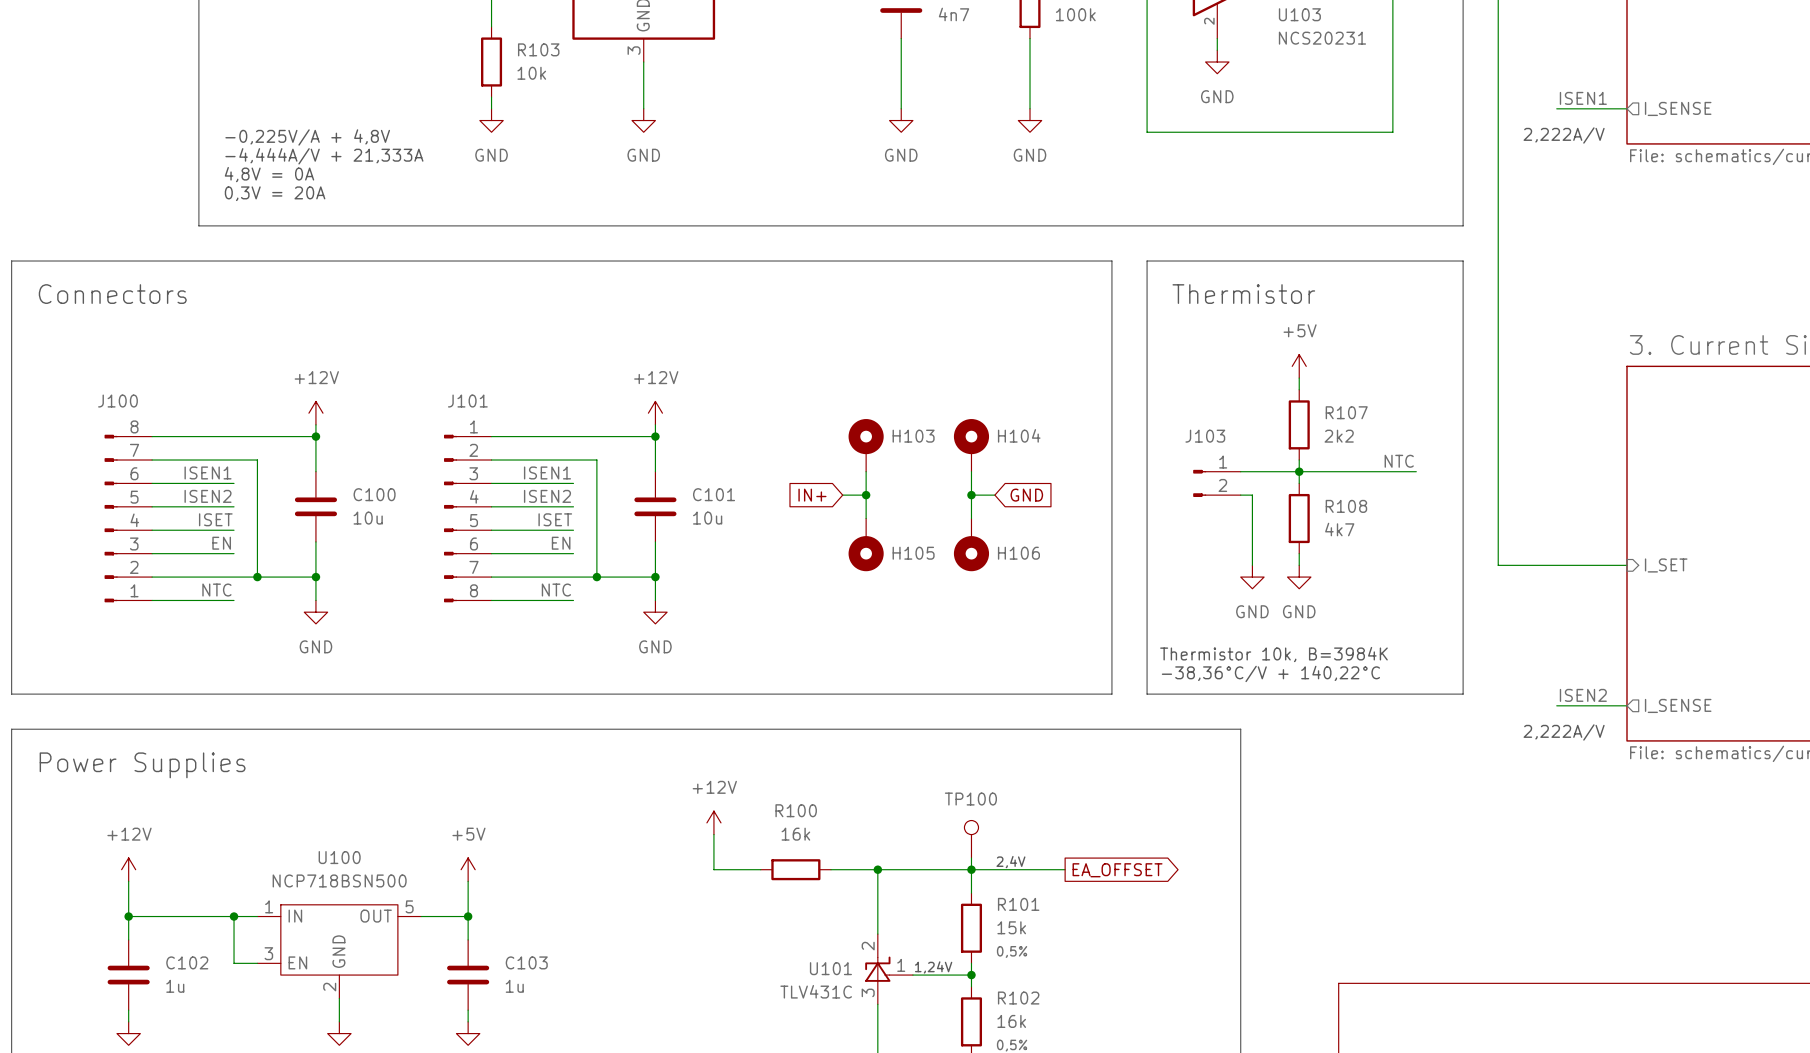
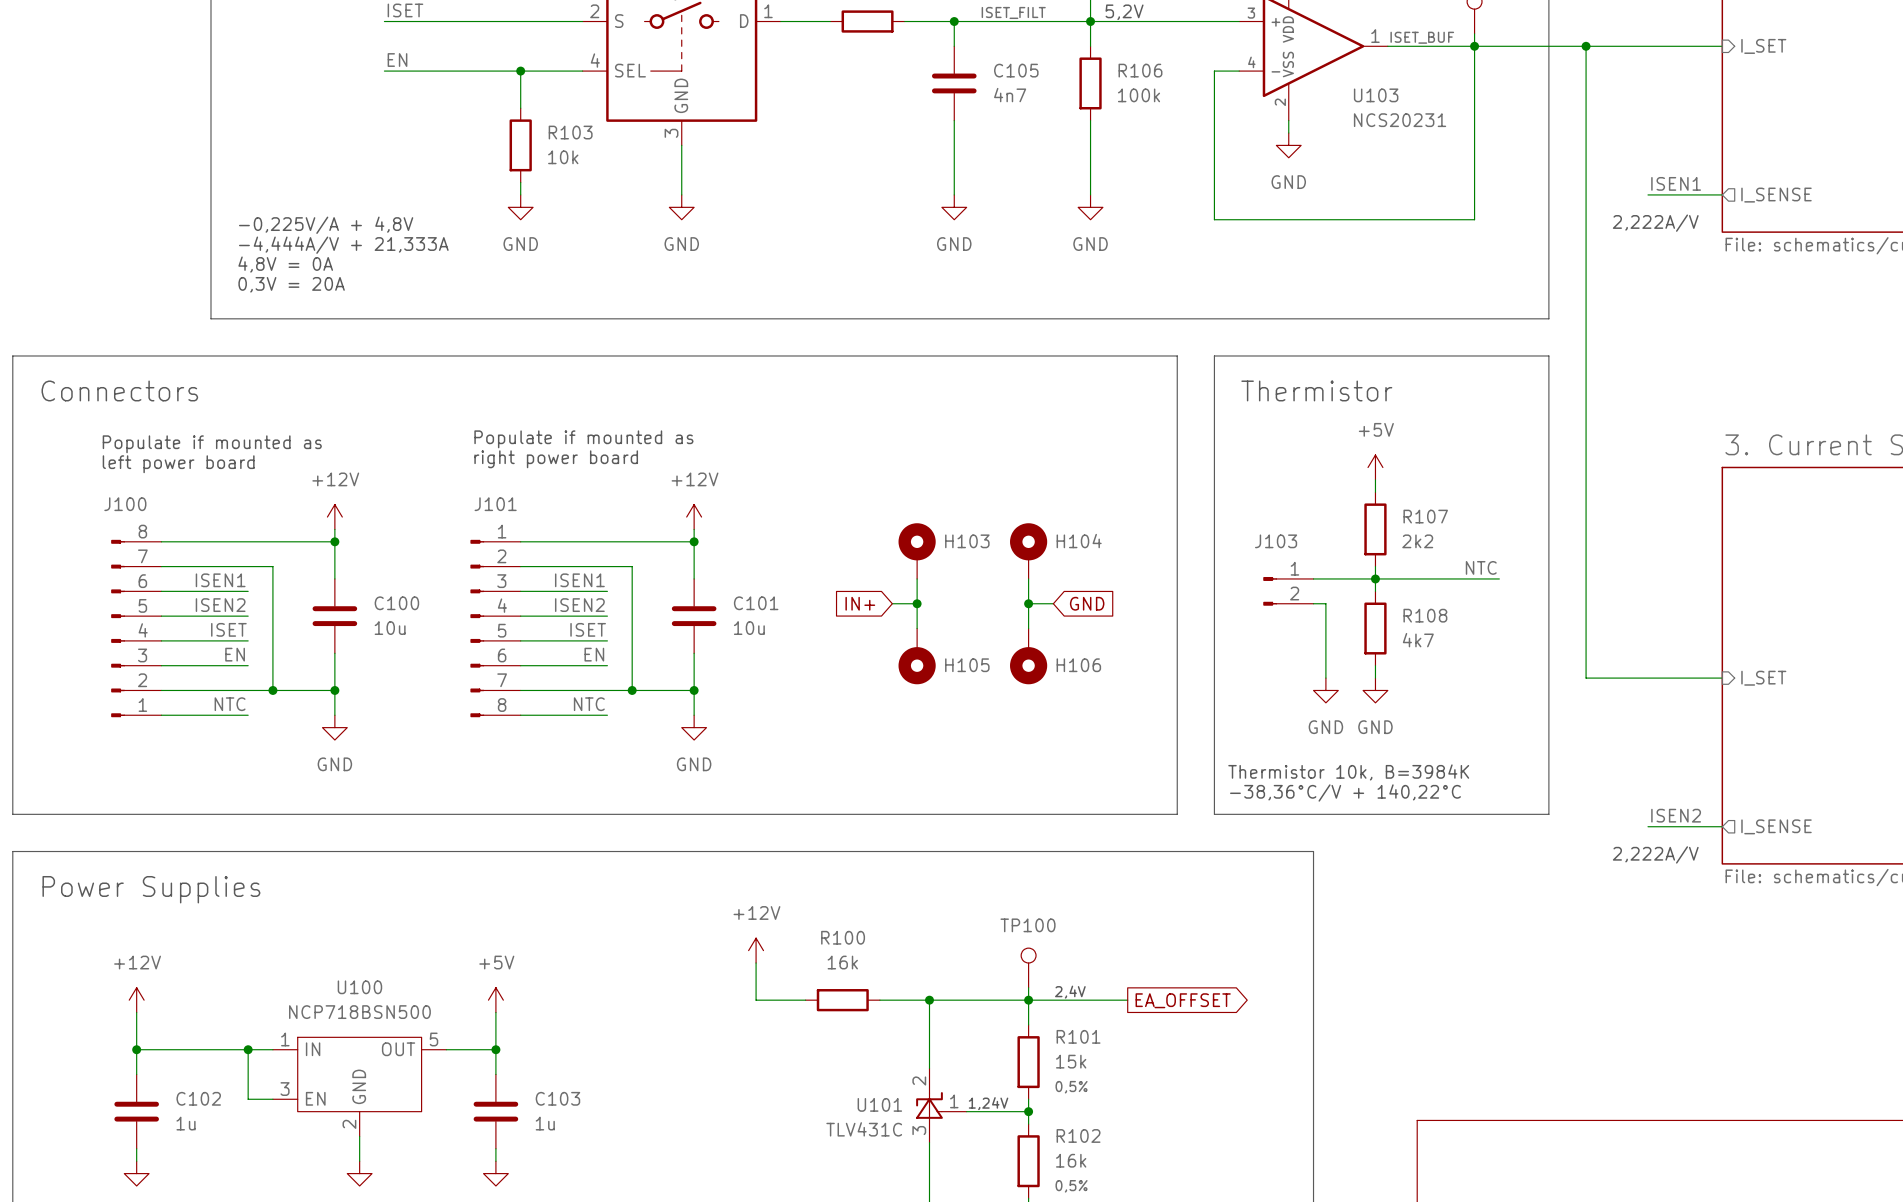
text: none -> Populate if mounted as (583, 439)
text: none -> Populate if mounted as (212, 444)
text: none -> right power board (556, 459)
text: none -> left power board (178, 464)

